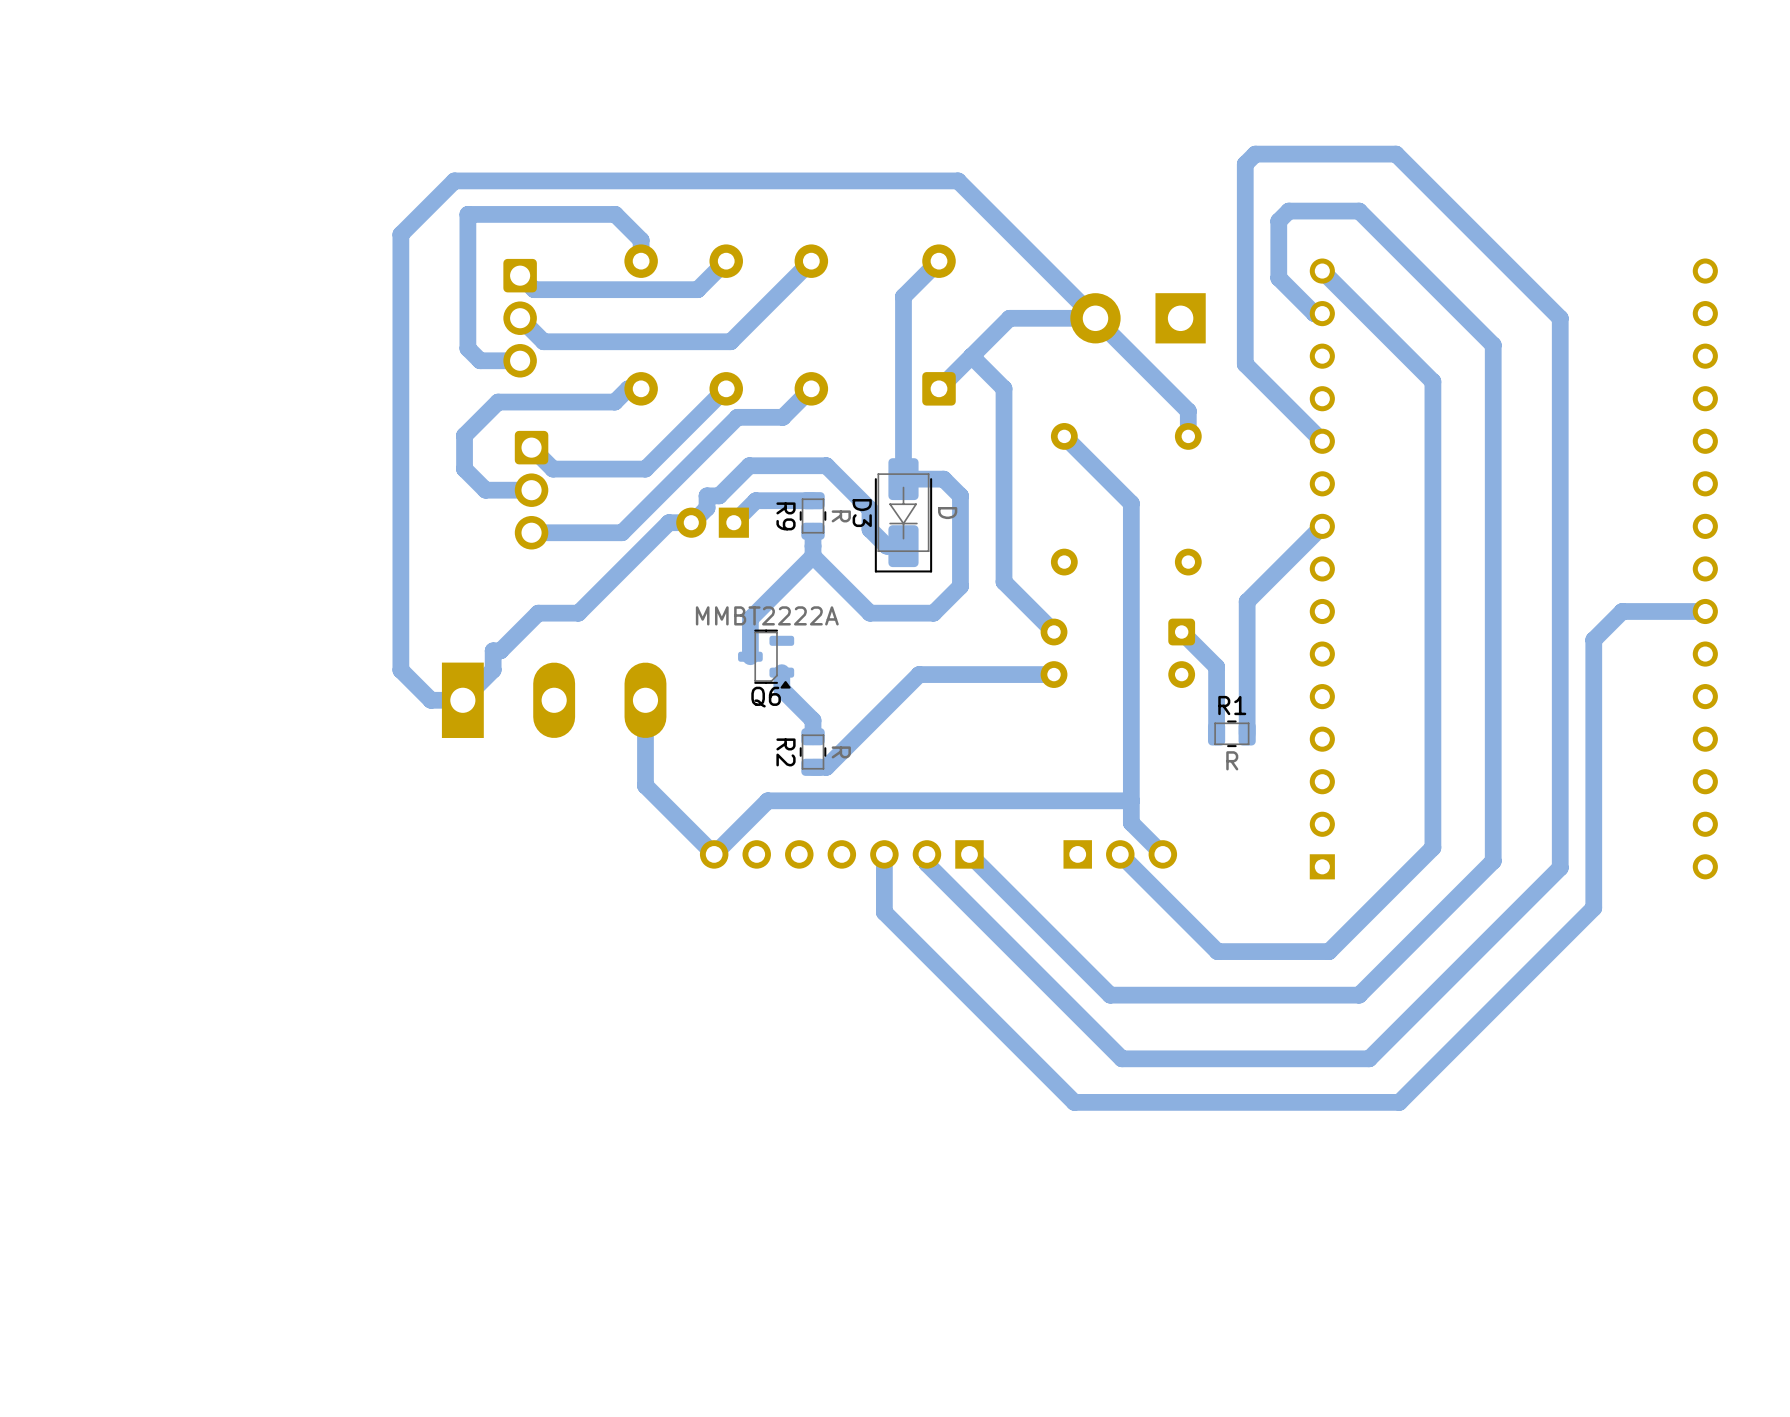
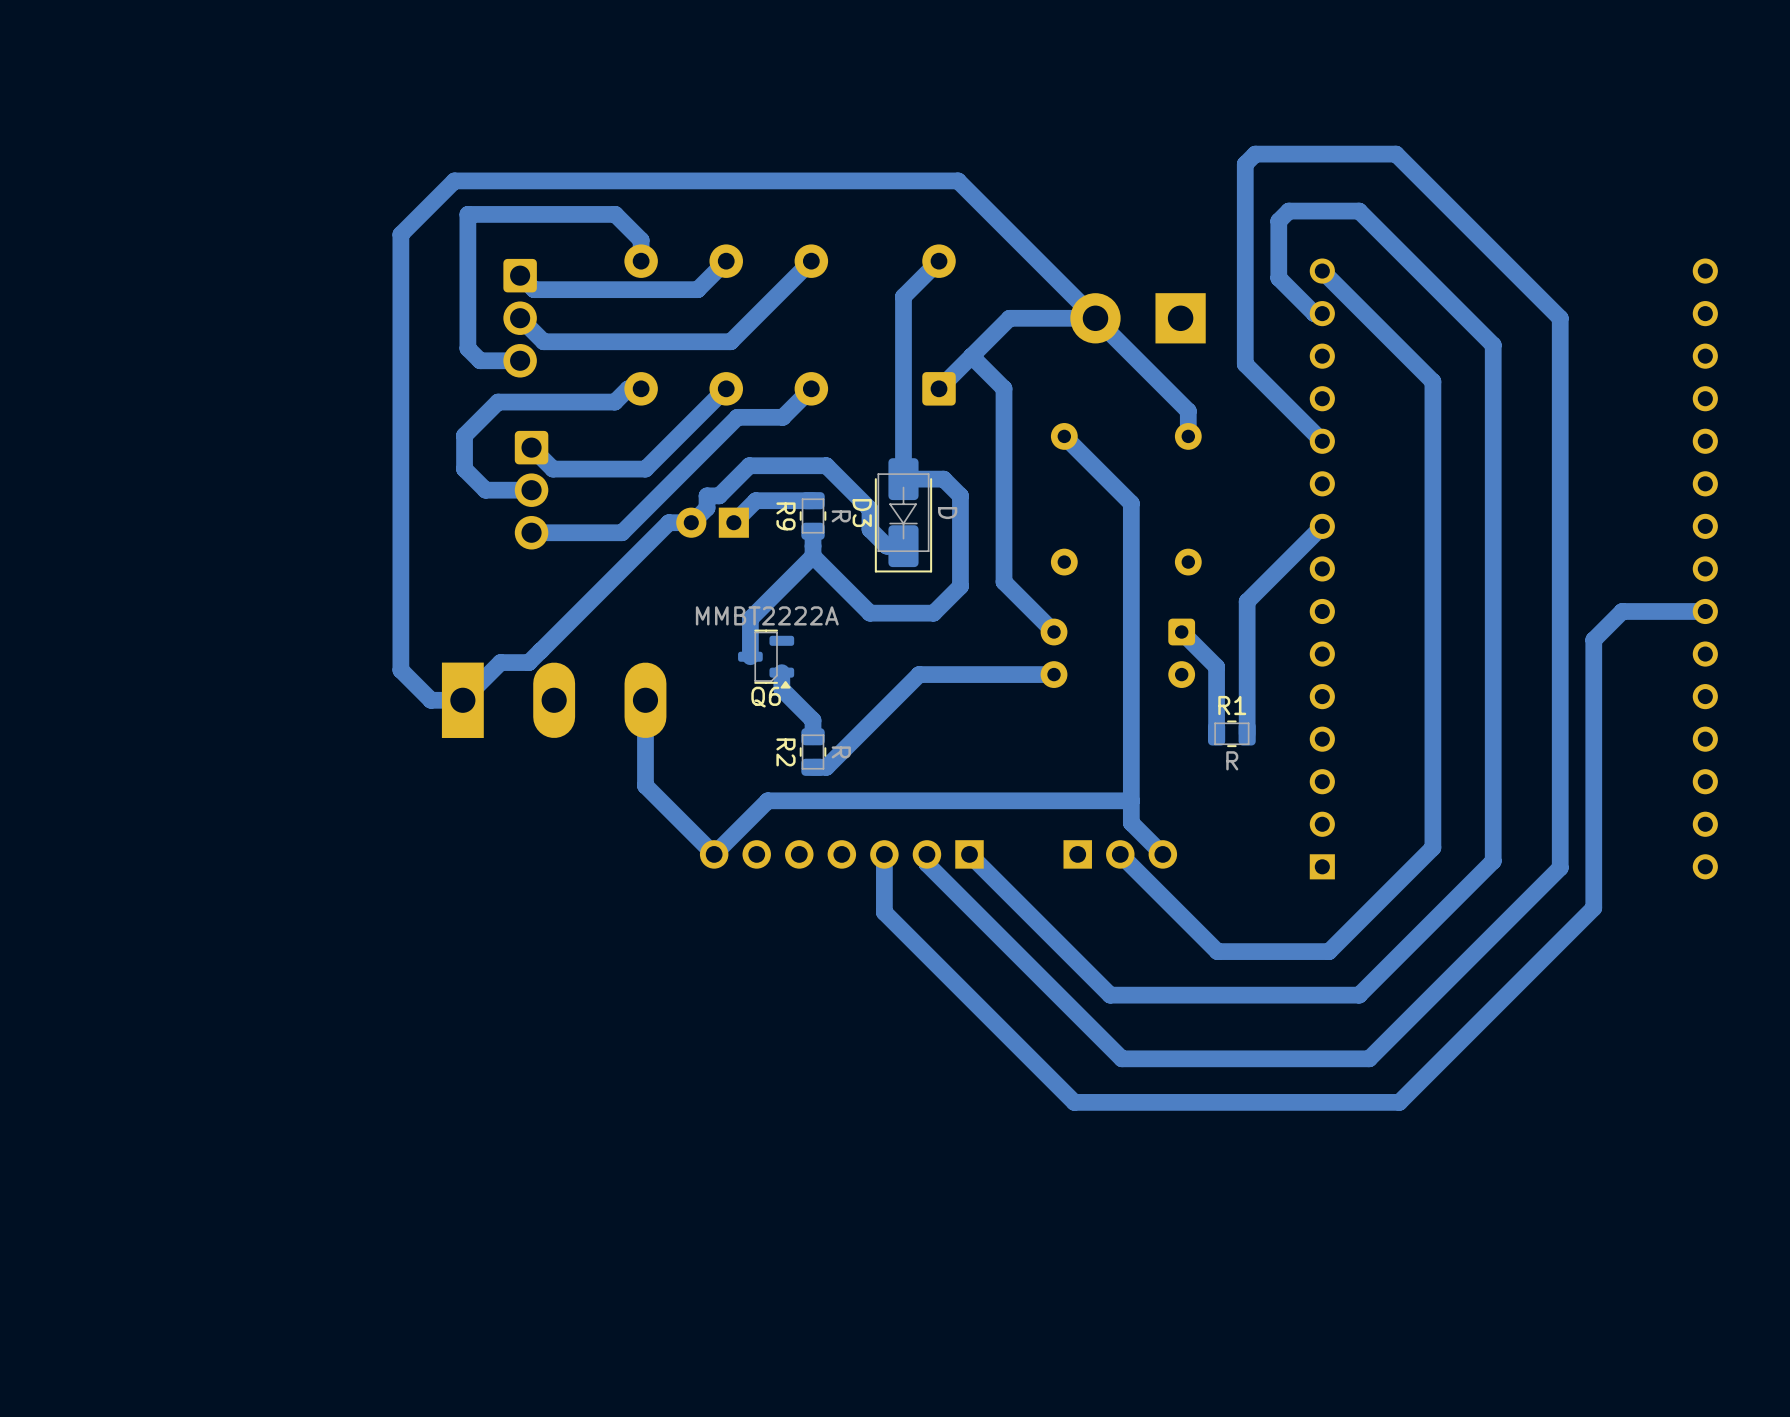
bottom track: (578, 613) (538, 613) (500, 650) (493, 650) (493, 669) -> (578, 613) (540, 650)
bottom track: none -> (540, 650) (528, 662) (500, 662) (493, 669)

